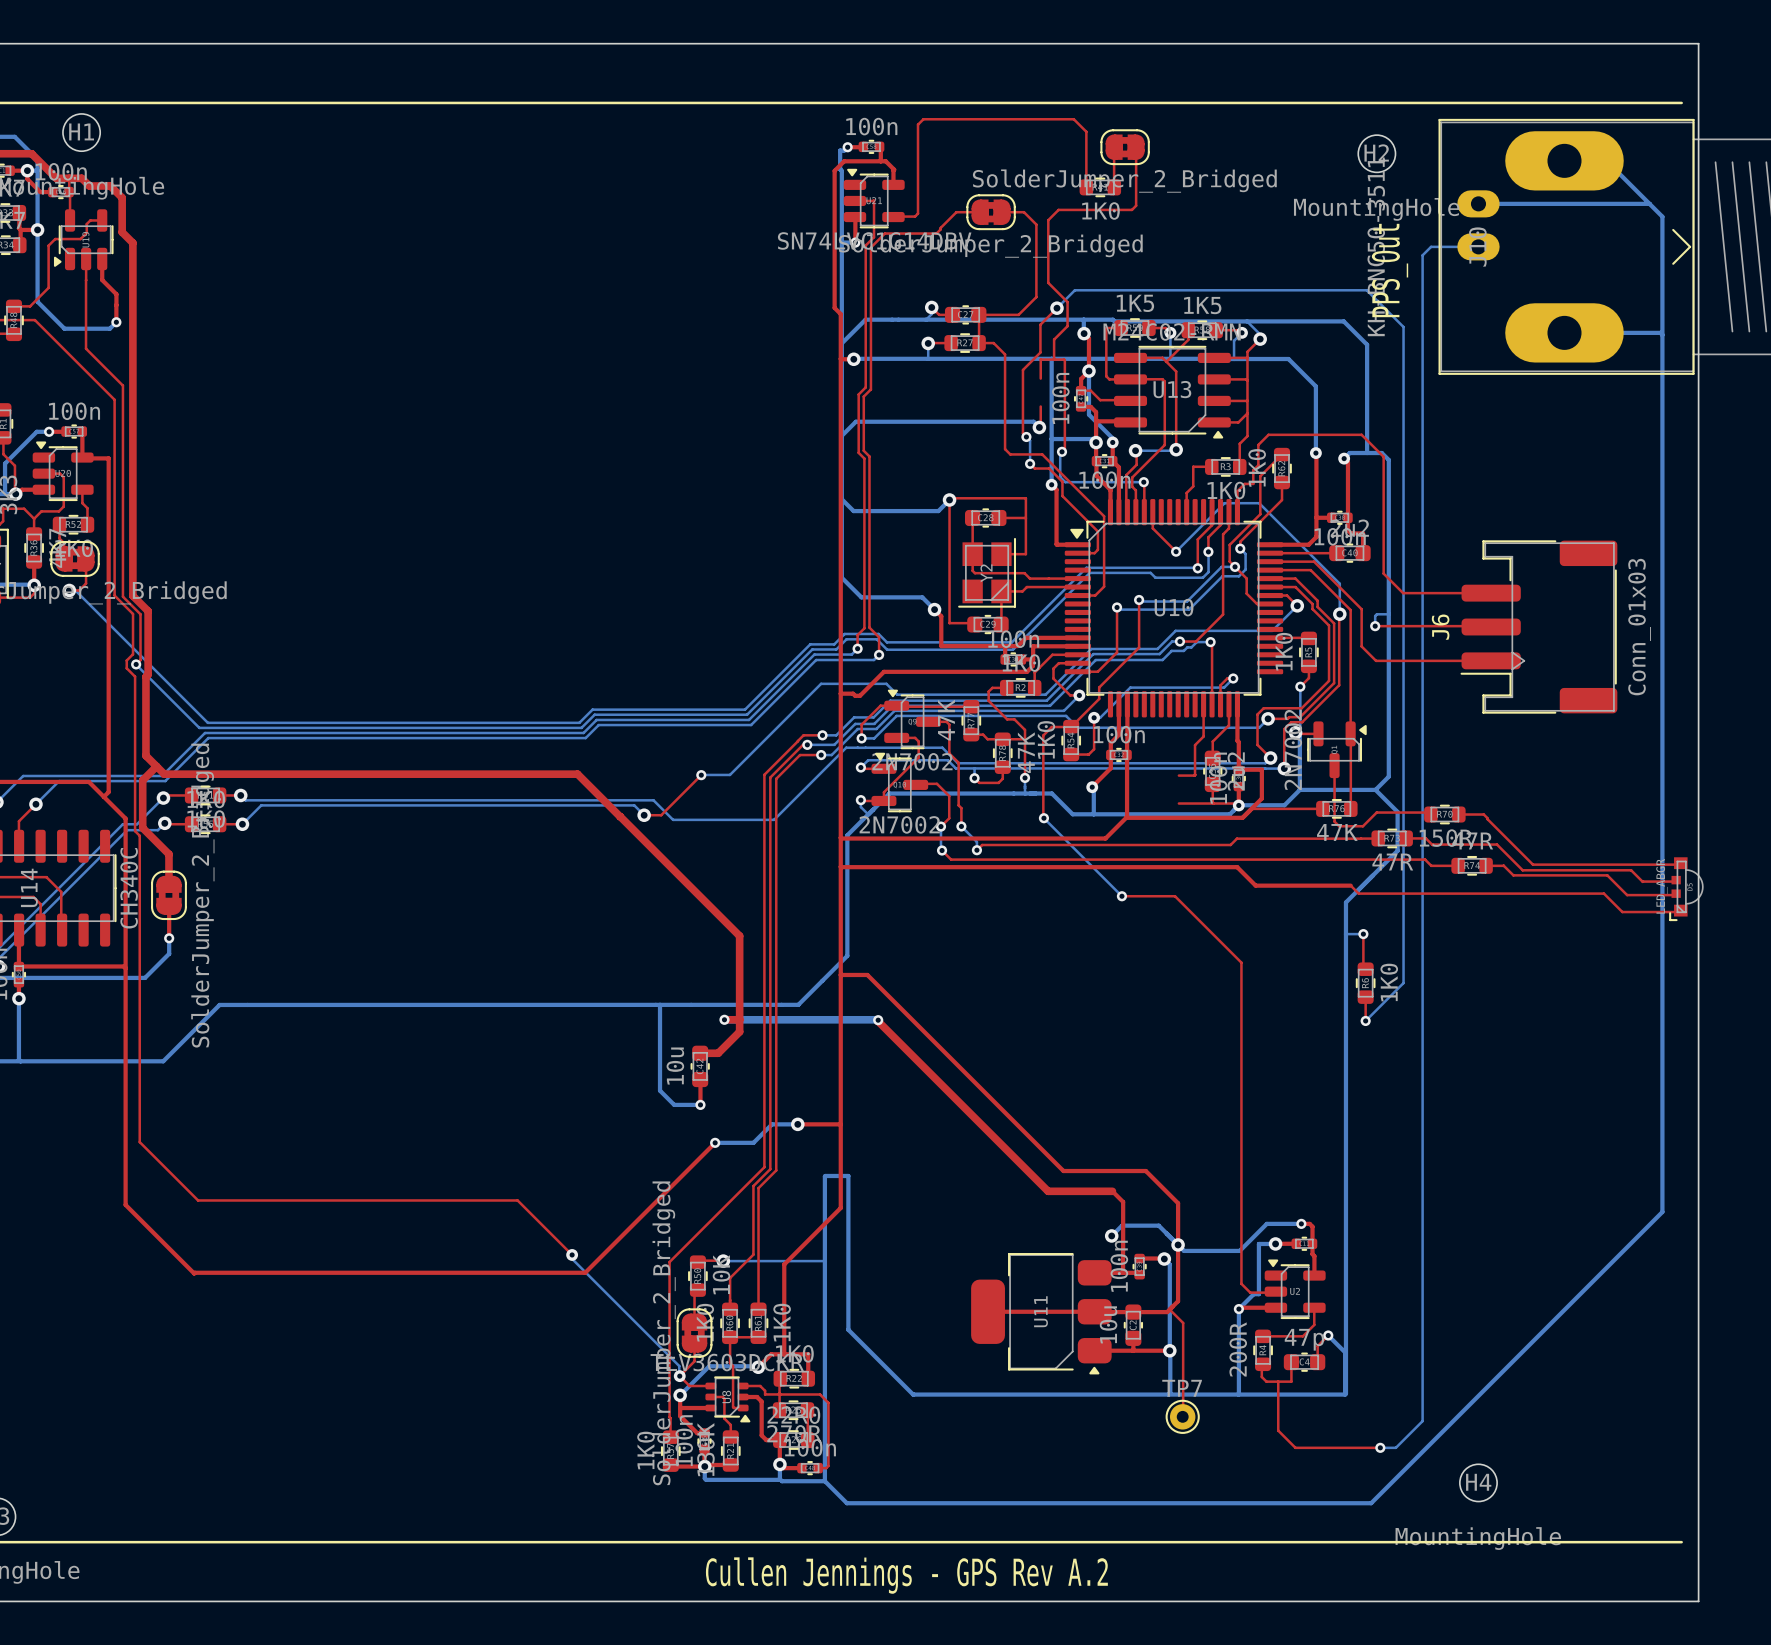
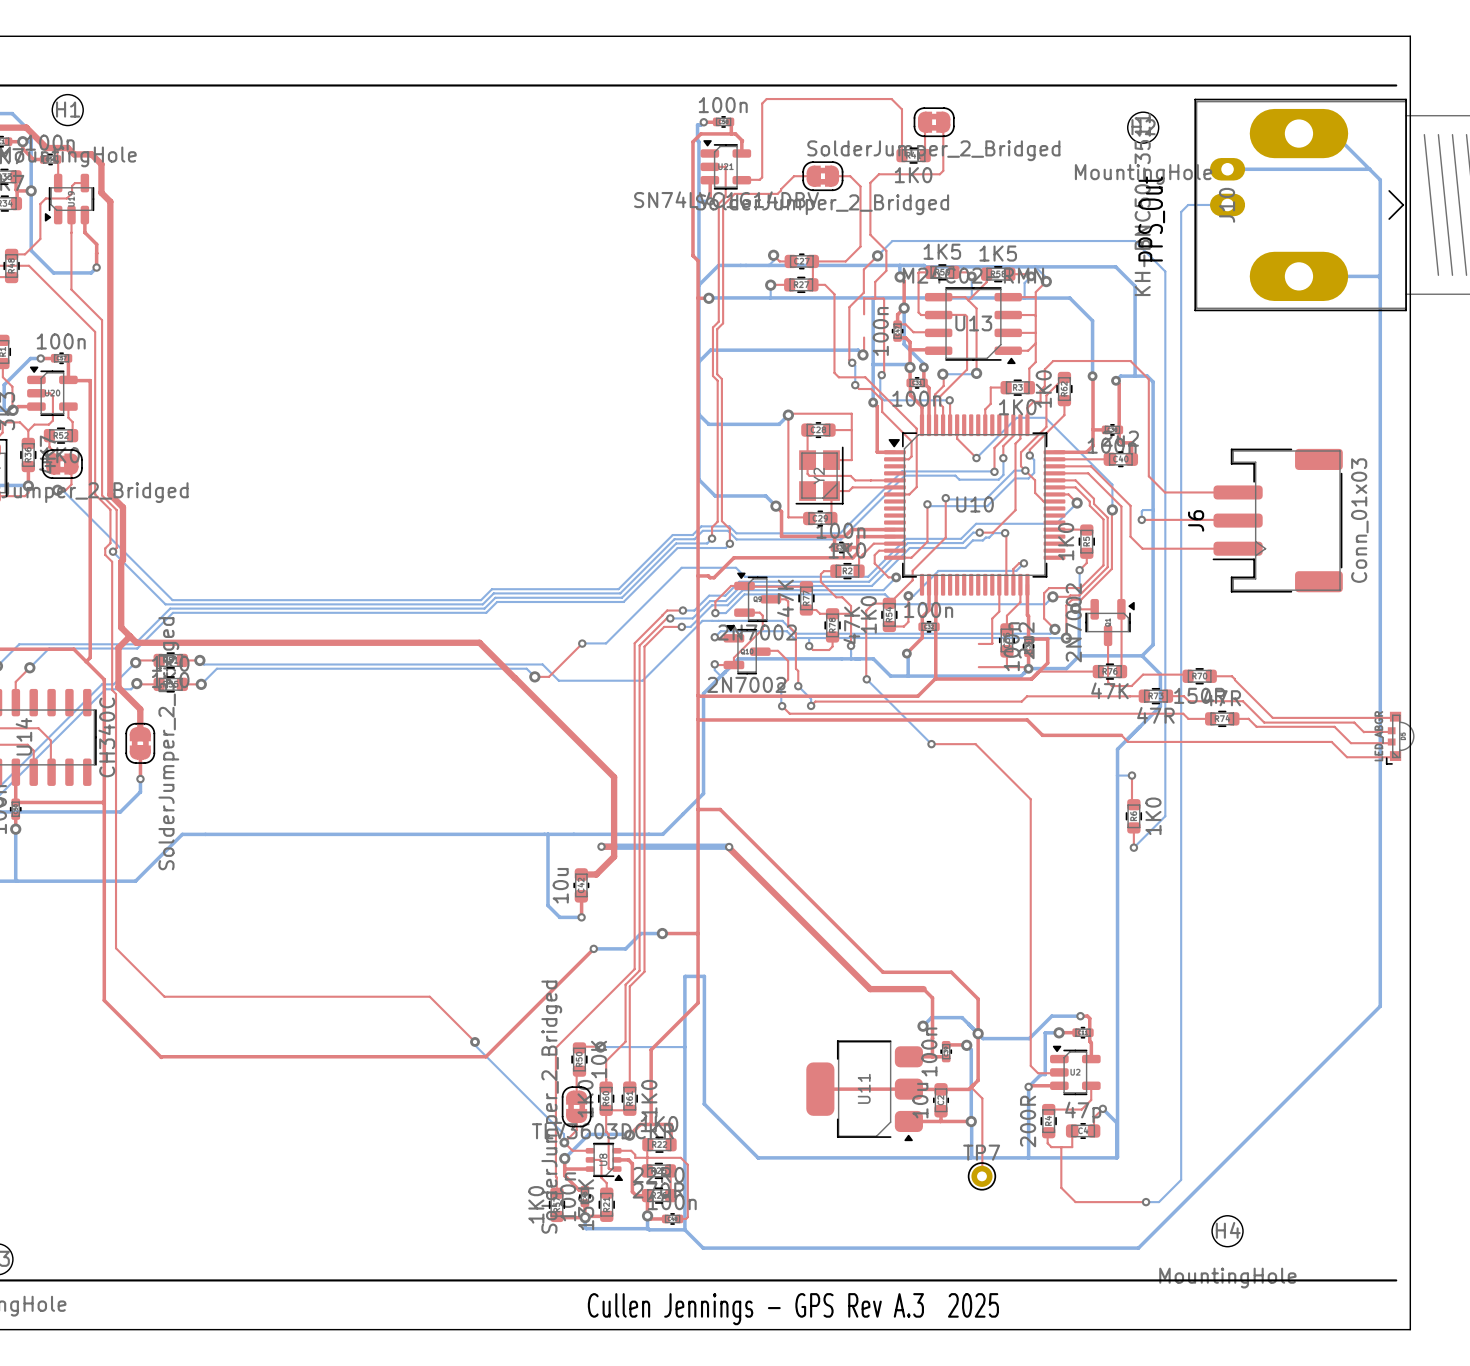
text: Cullen Jennings - GPS Rev A.2 (906, 1575) -> Cullen Jennings - GPS Rev A.3 2025 (793, 1309)

